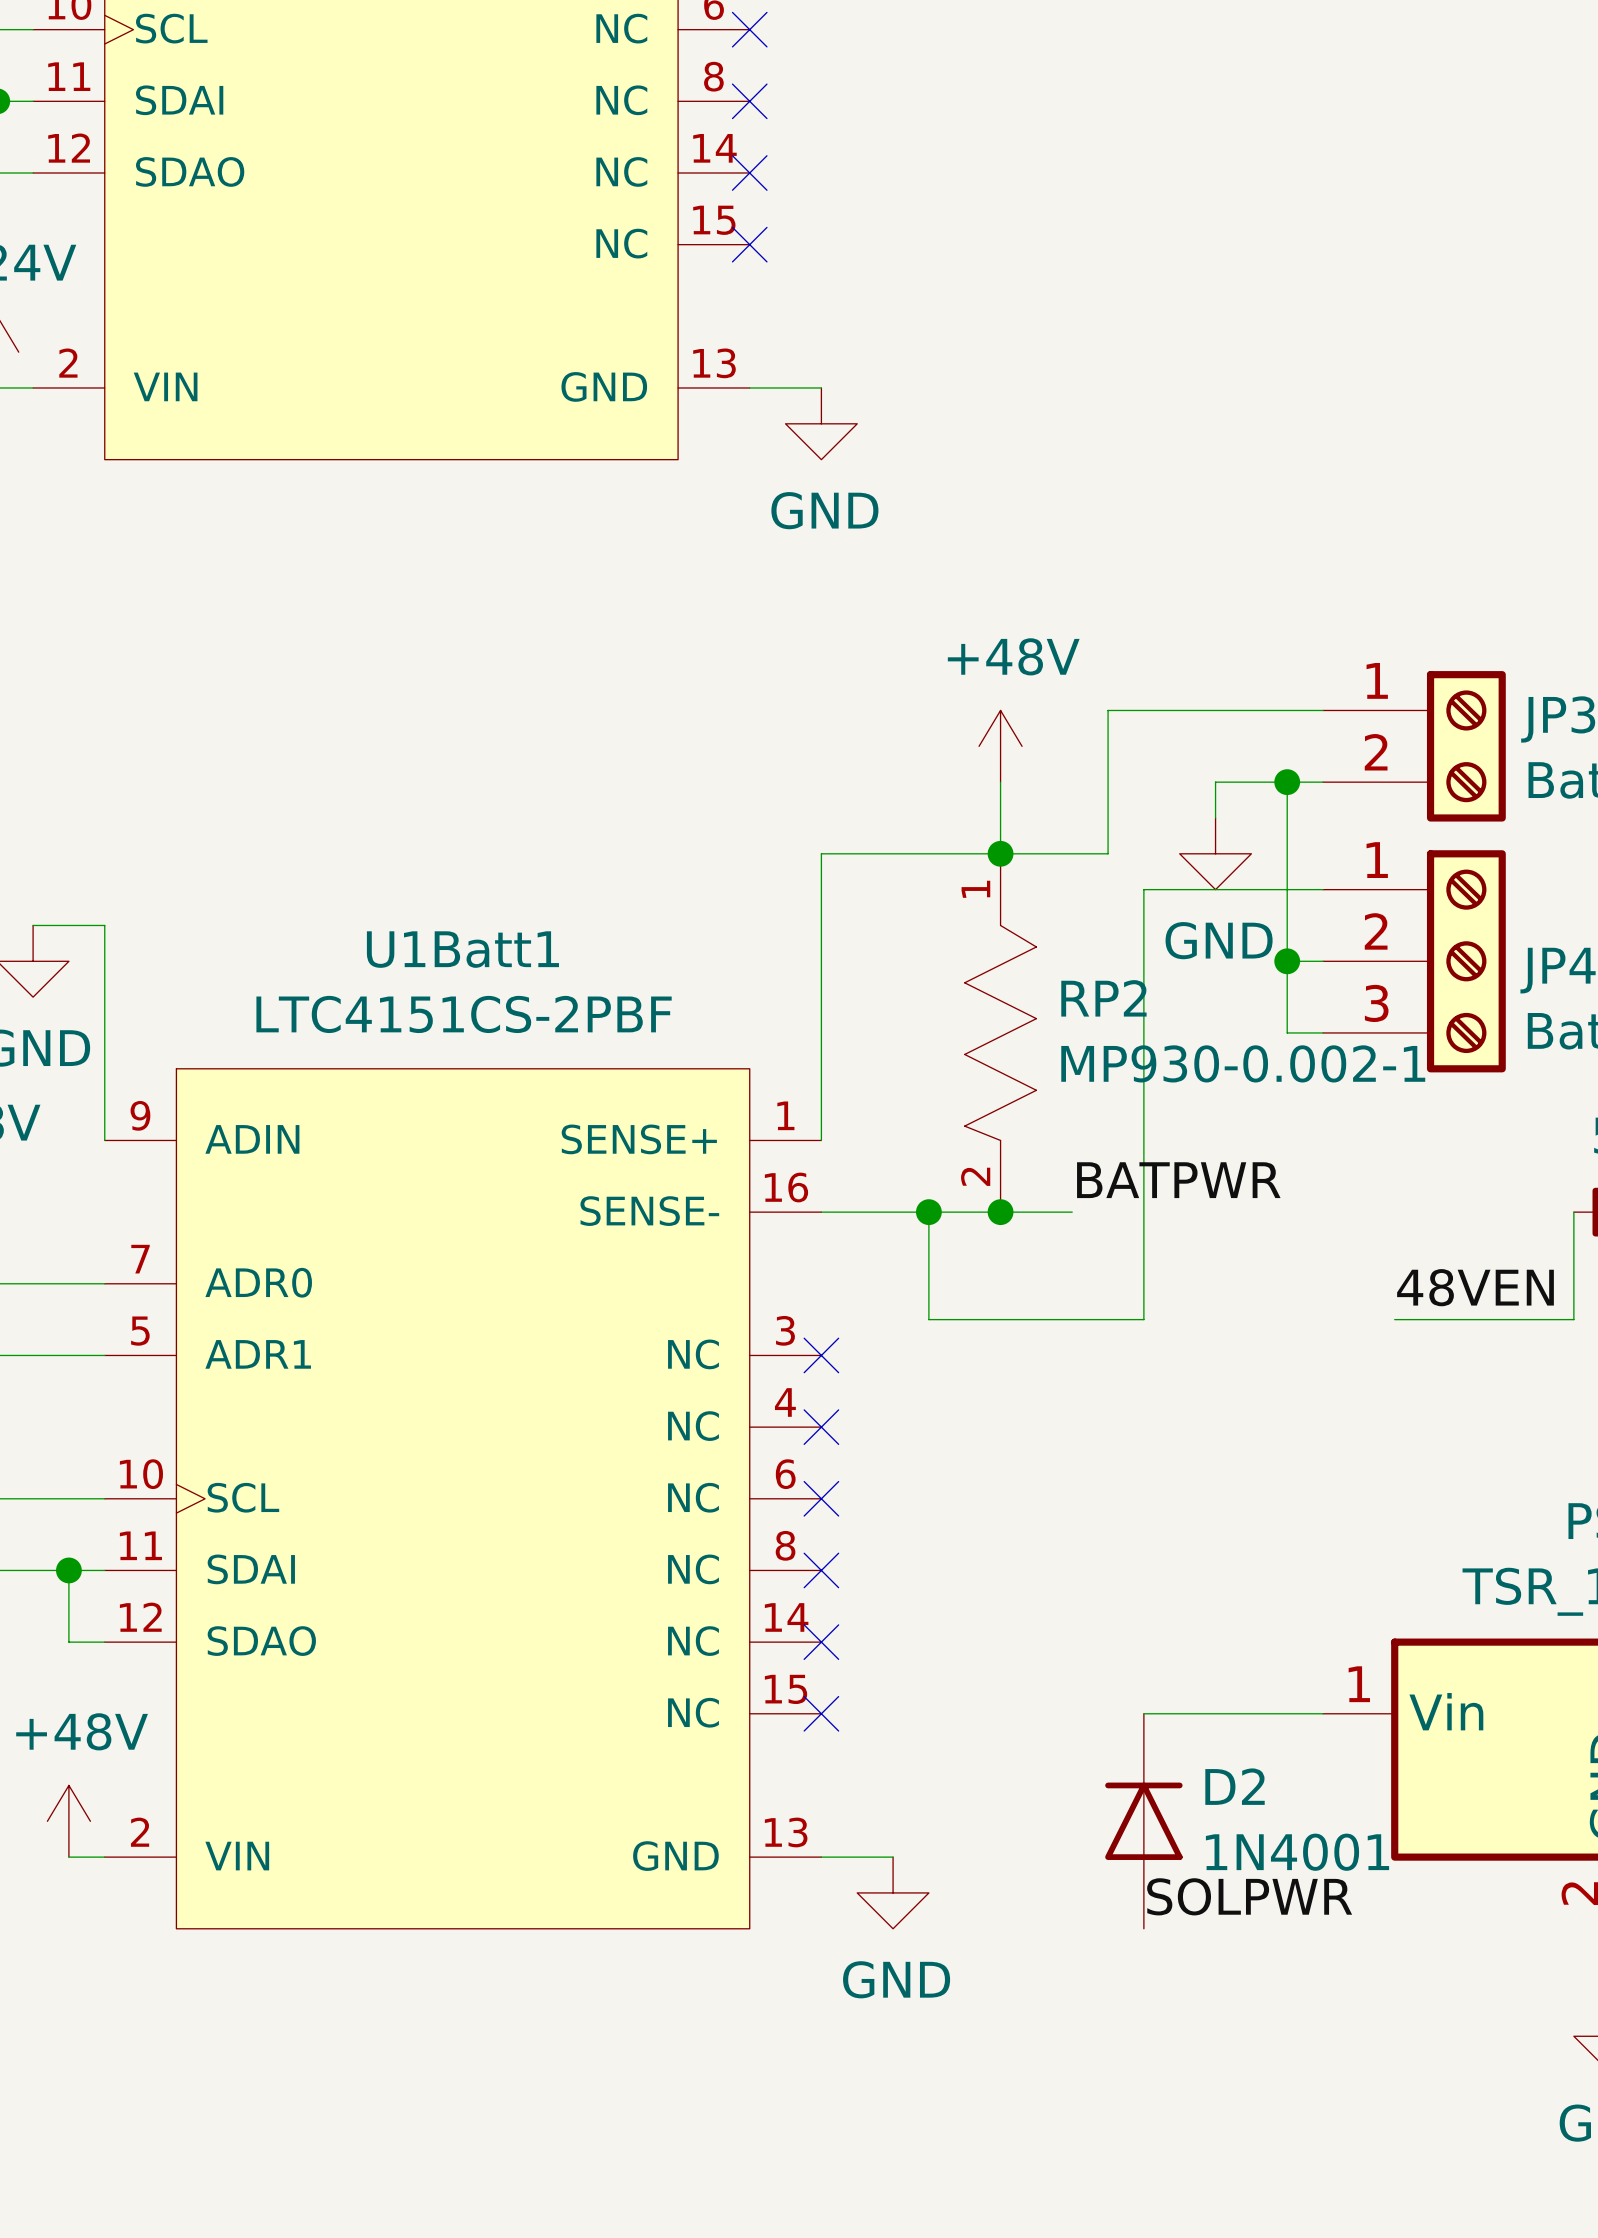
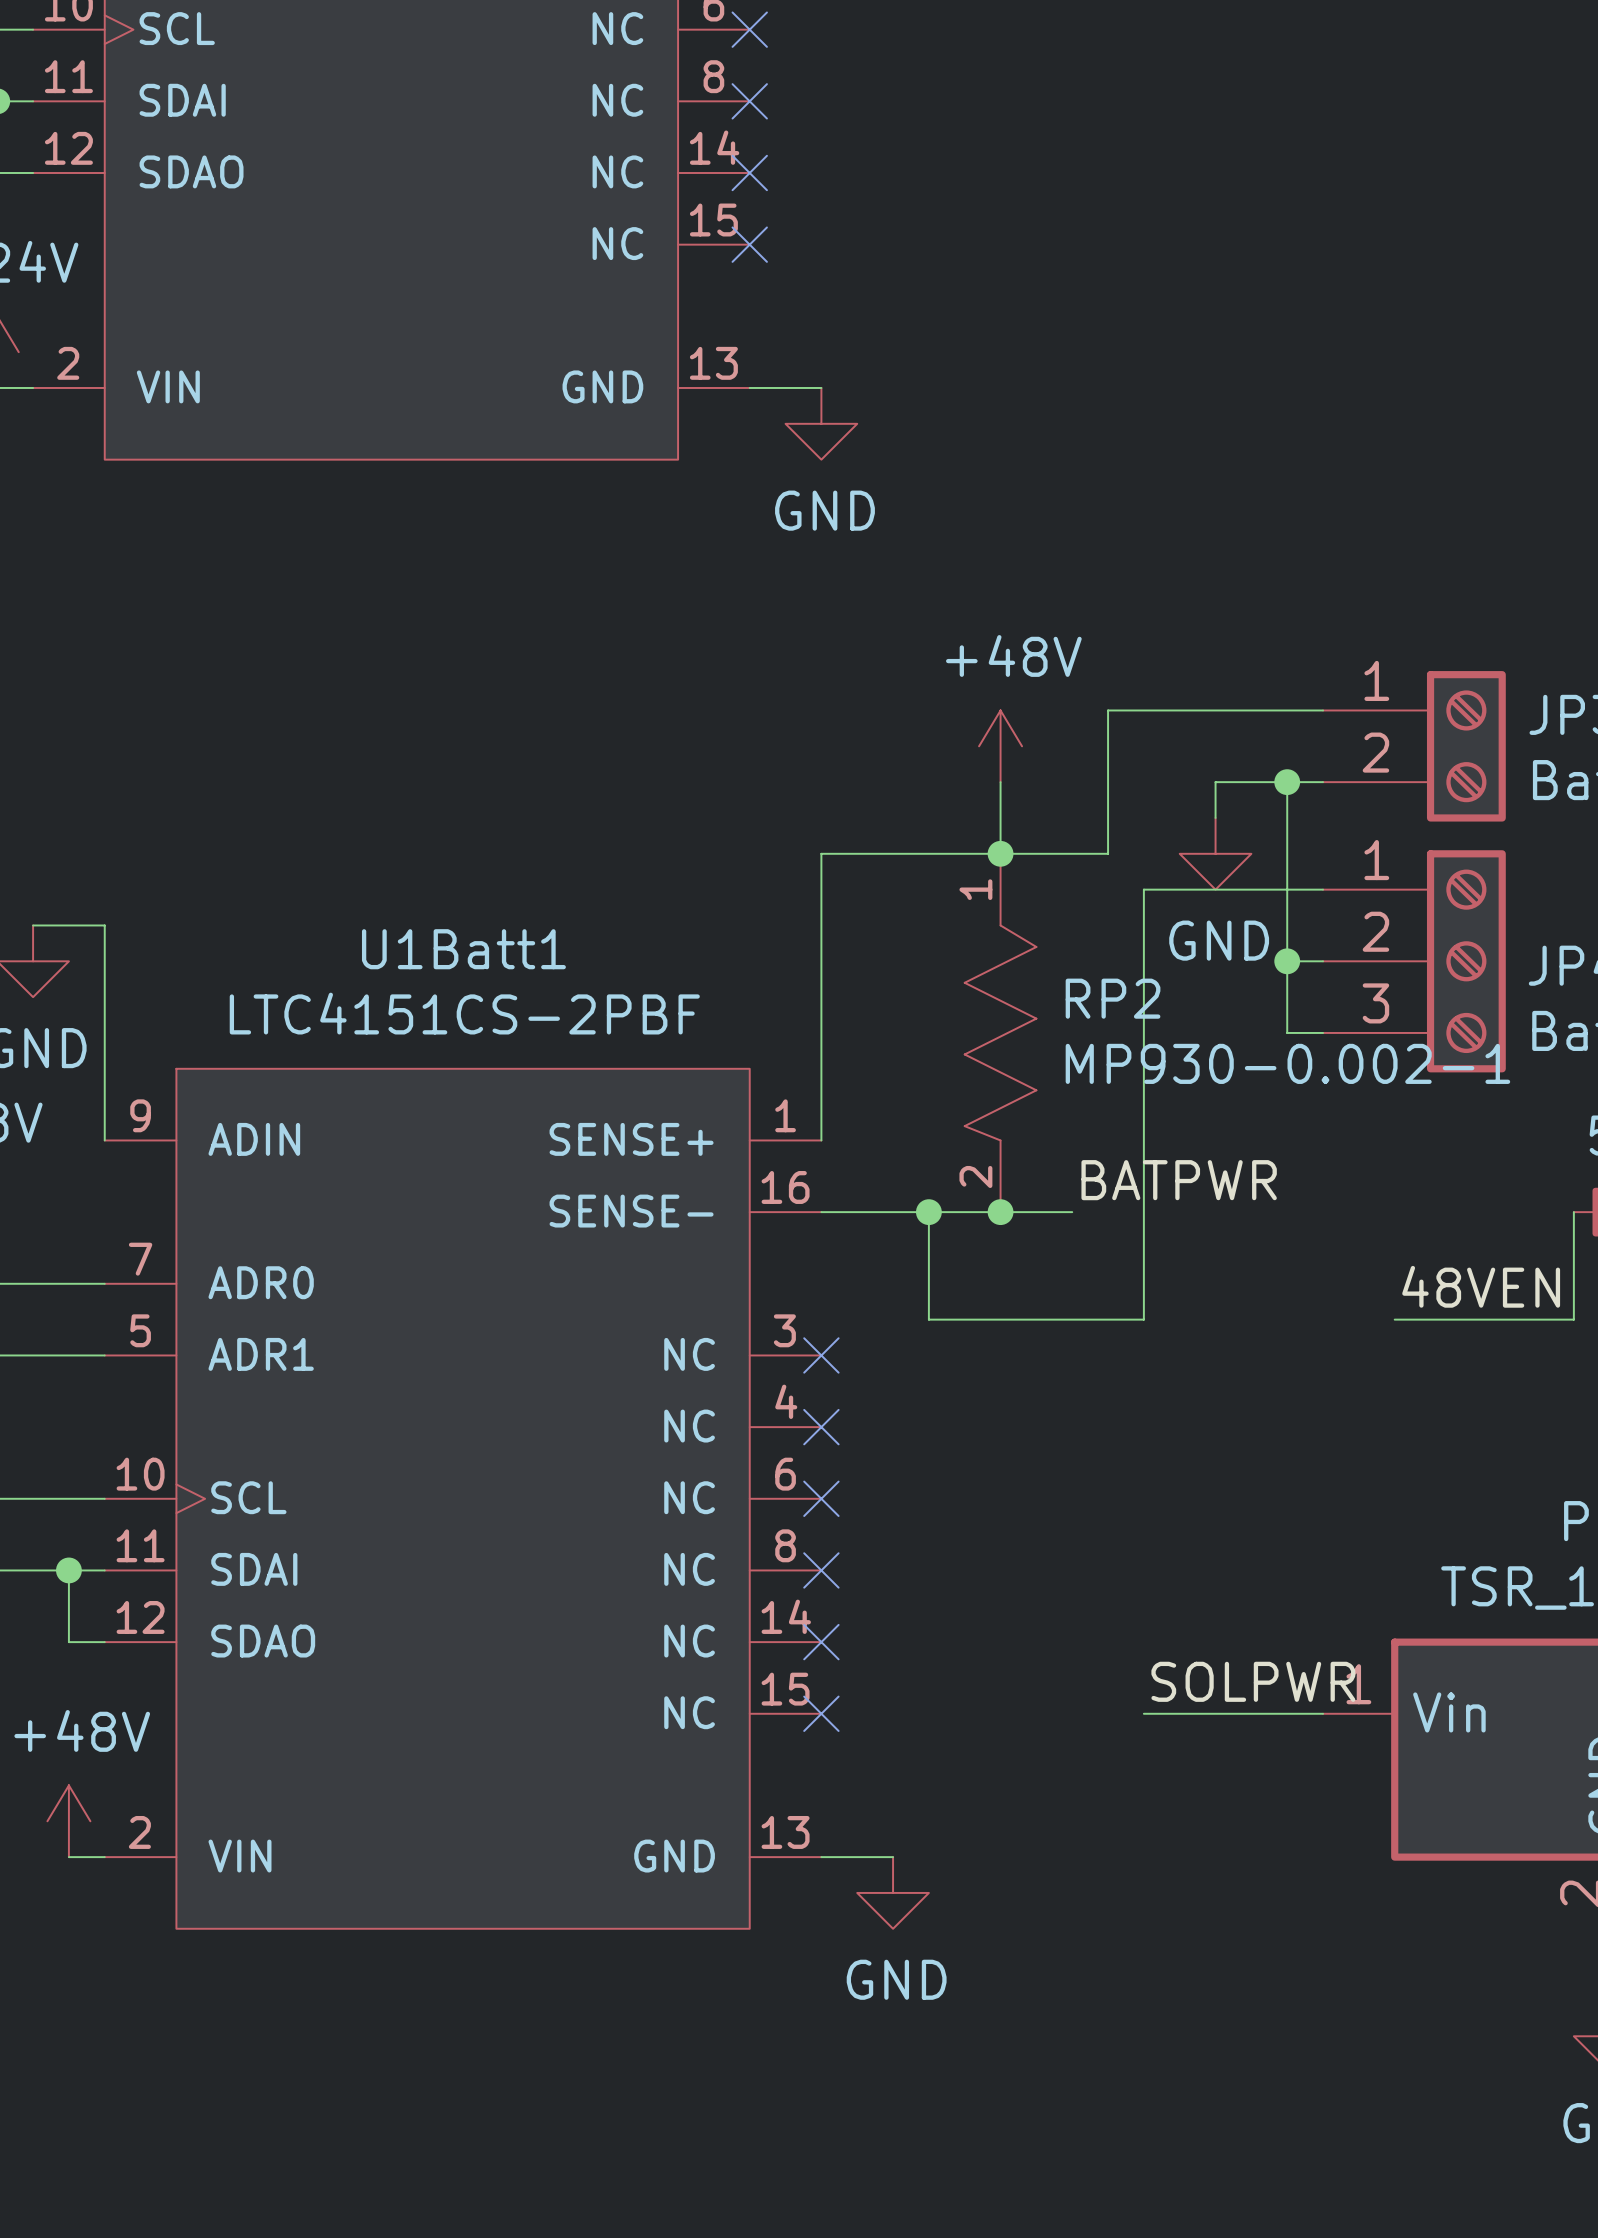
D2: 1N4001 (1143, 1821) -> none
label position: SOLPWR (1249, 1896) -> SOLPWR (1253, 1681)

